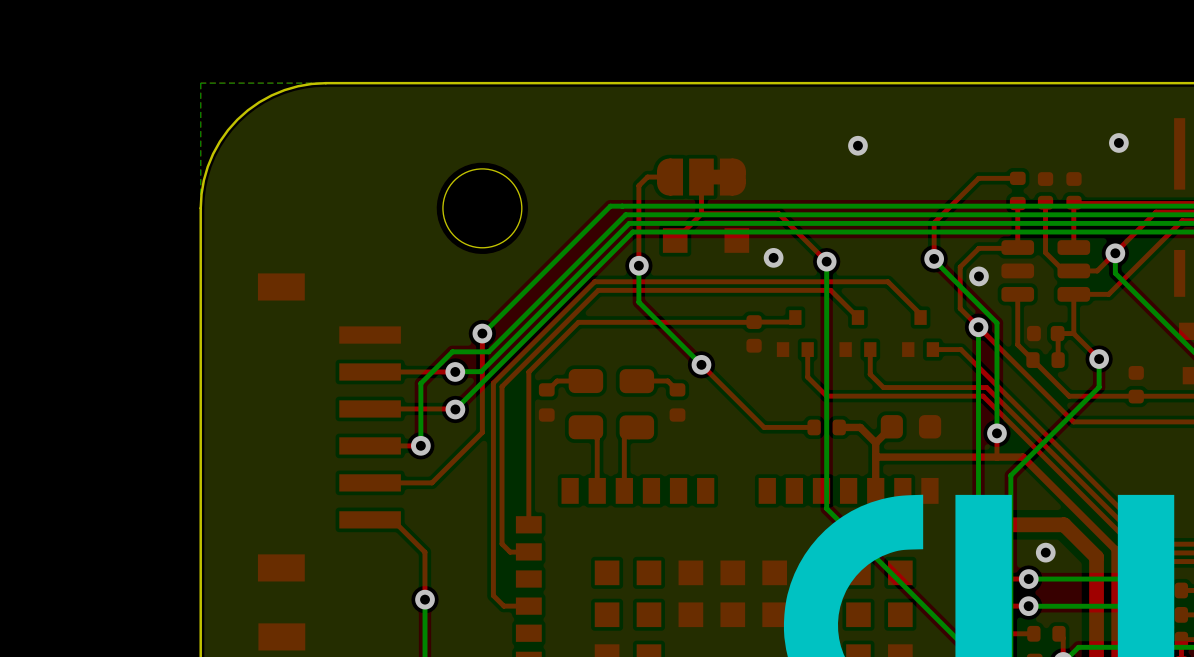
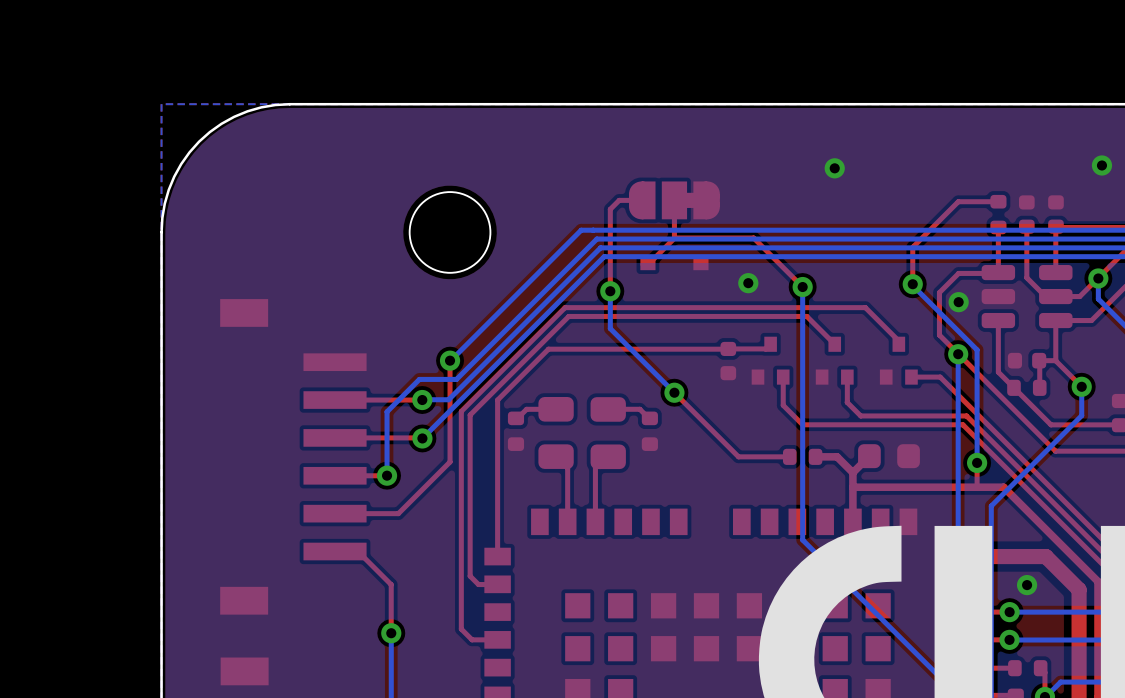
part footprint: [662, 228, 750, 253] -> [640, 258, 709, 271]

